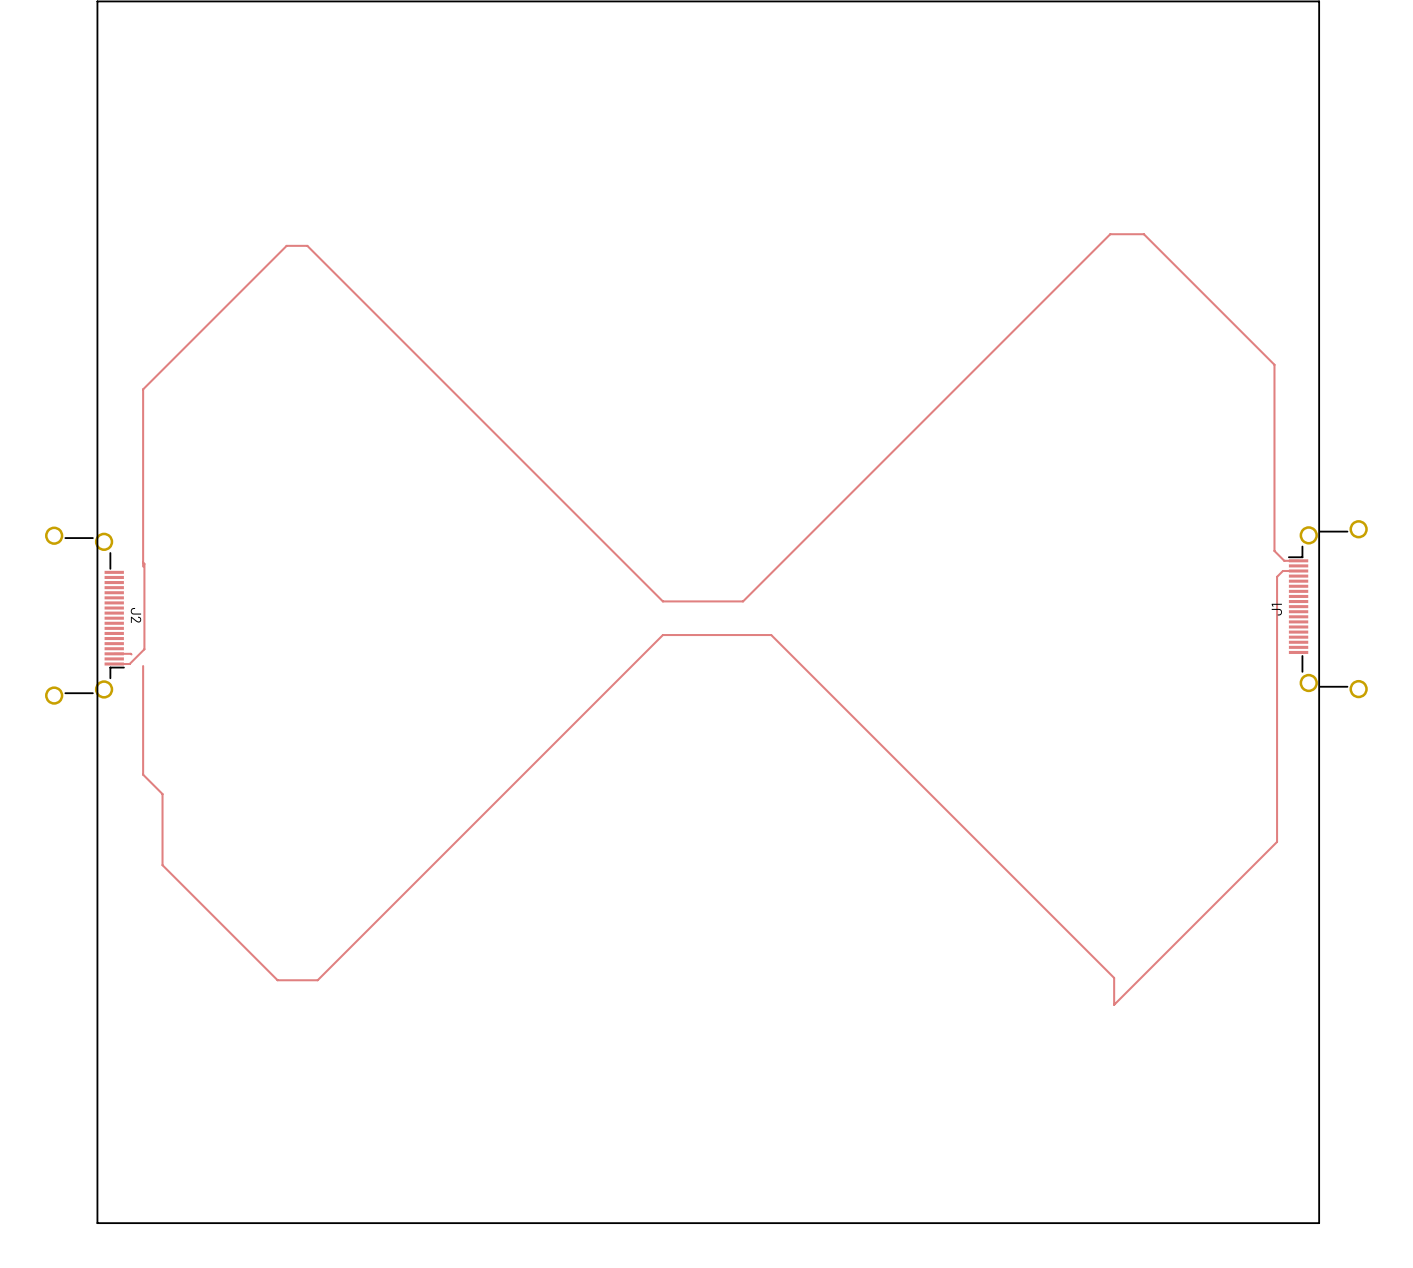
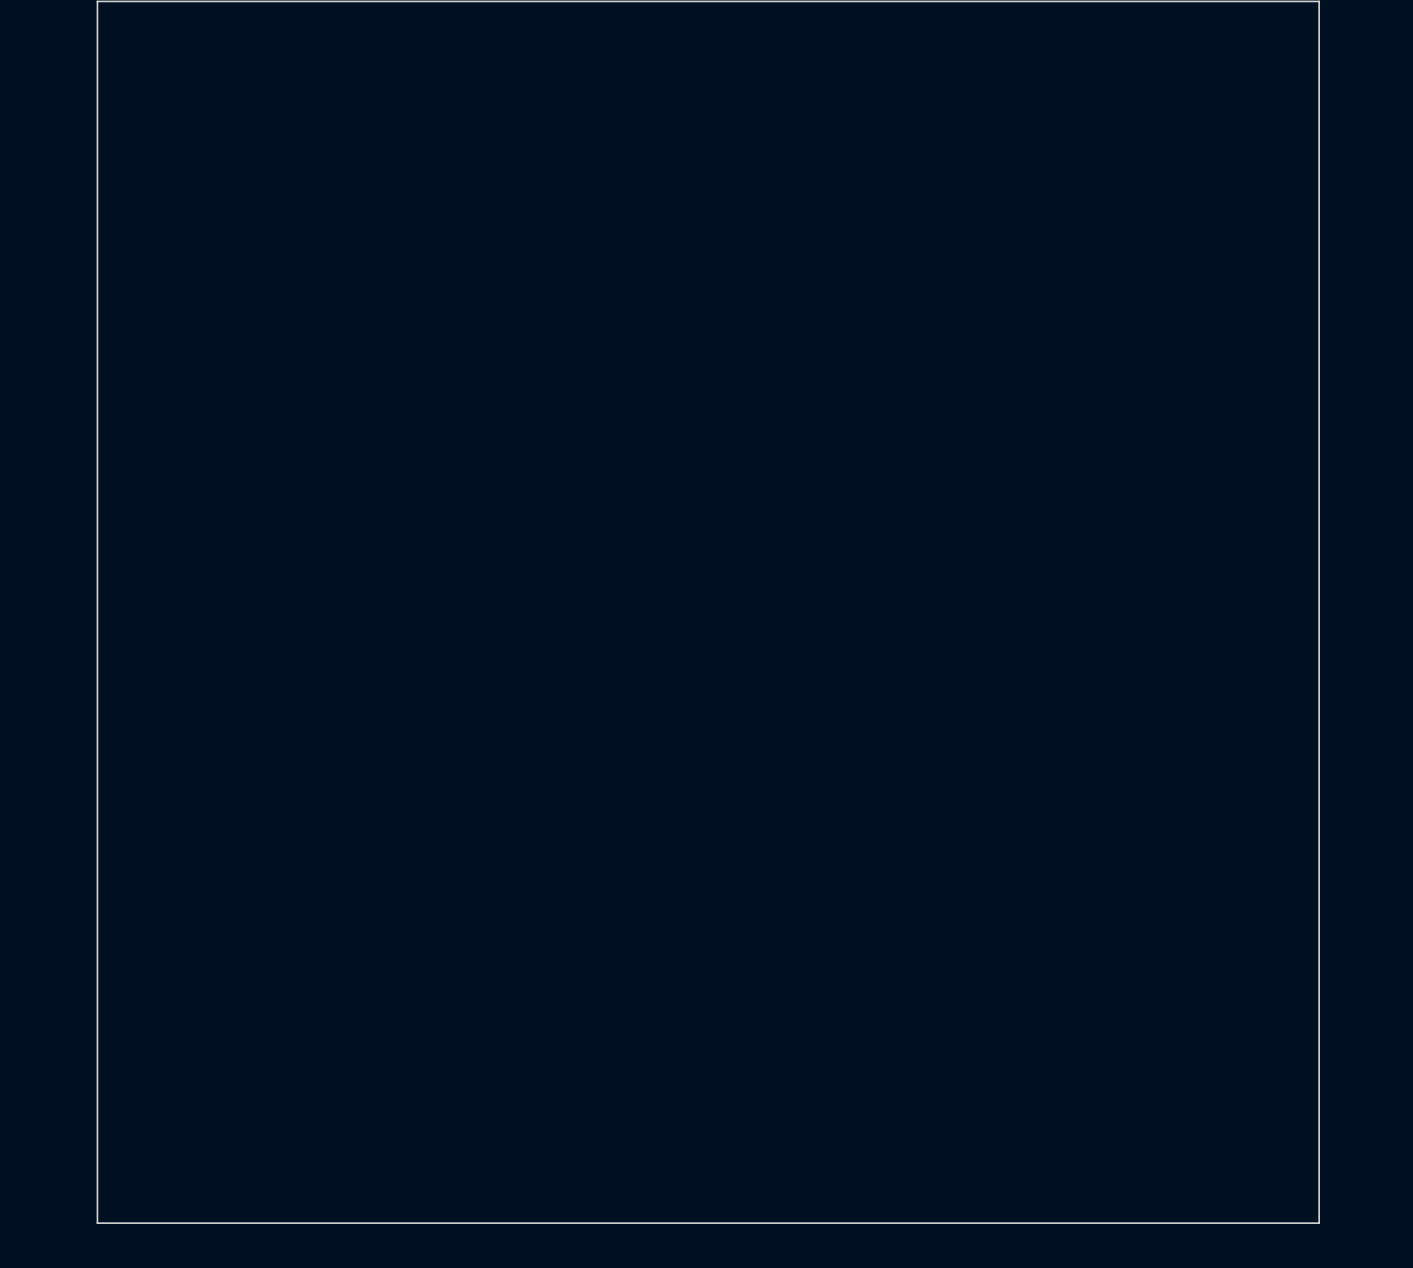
track: (1298, 560) (1284, 560) (1274, 550) (1274, 364) (1143, 234) (1110, 234) (743, 601) (662, 601) (307, 245) (286, 245) (143, 389) (143, 566) -> none
track: (143, 562) (144, 649) (129, 664) (114, 664) -> none
track: (1298, 571) (1282, 571) (1277, 576) (1277, 841) (1114, 1004) (1114, 977) (771, 635) (662, 635) (317, 980) (277, 980) (162, 865) (162, 794) (143, 774) (143, 666) -> none
J1: (1328, 609) -> none
J2: (84, 615) -> none
track: (114, 653) (131, 654) -> none

